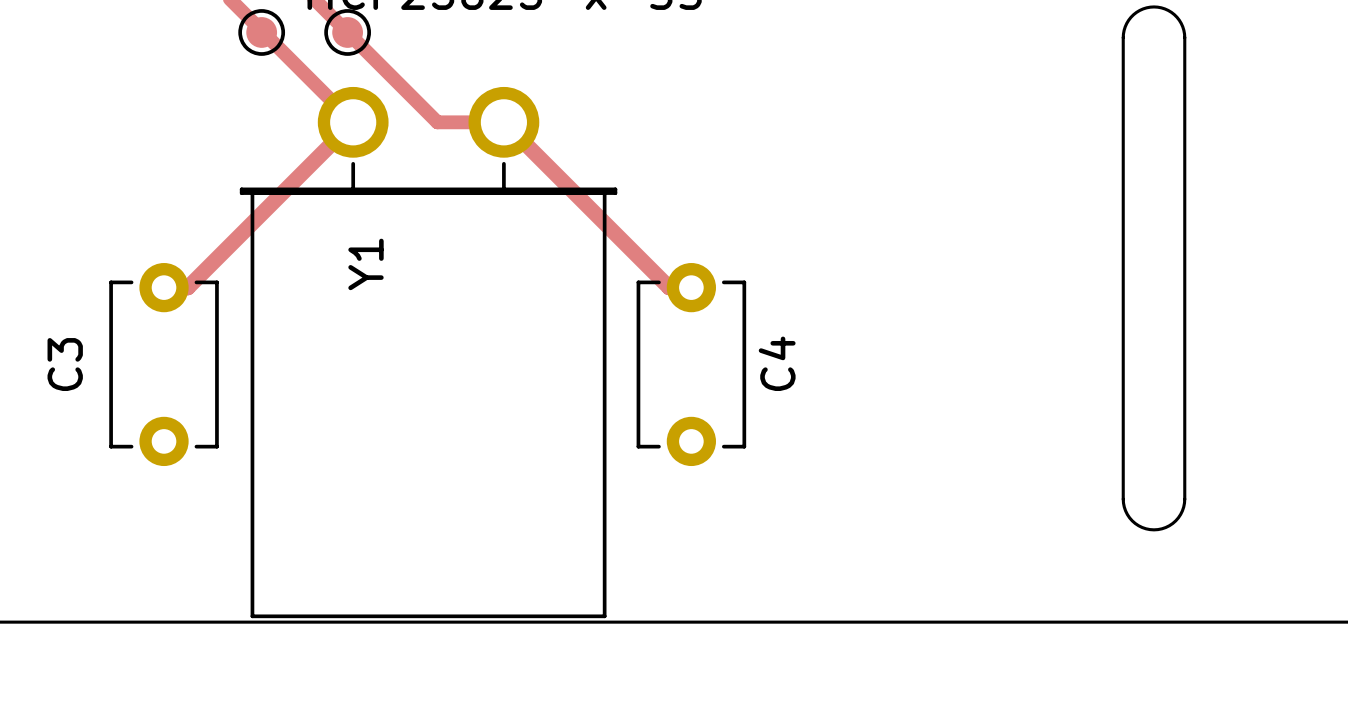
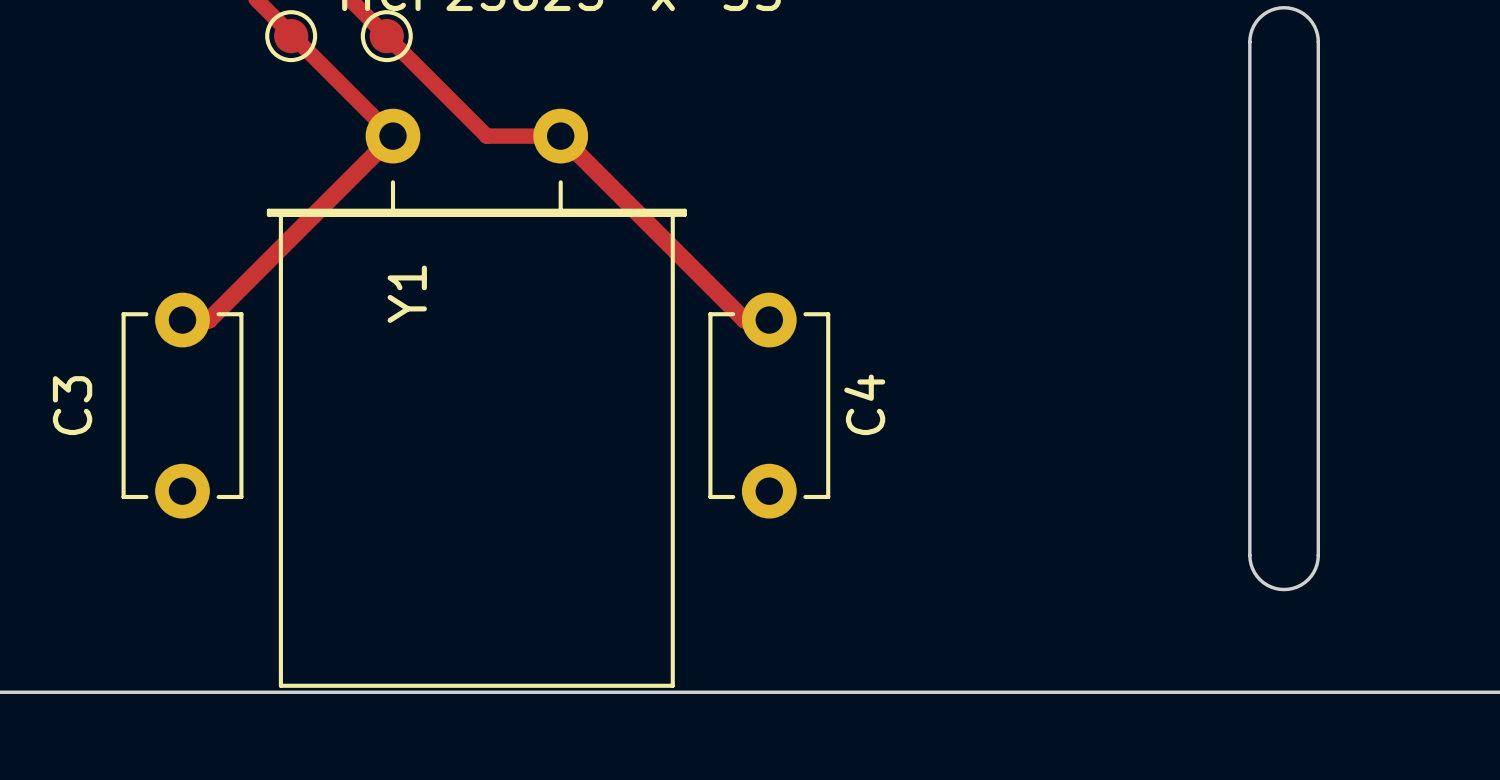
Y1 footprint: [239, 86, 618, 619] -> [266, 108, 687, 688]

